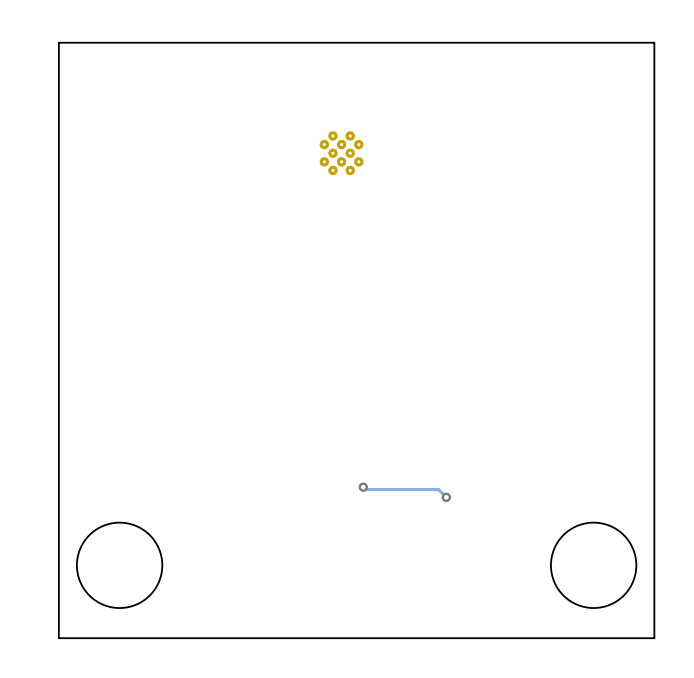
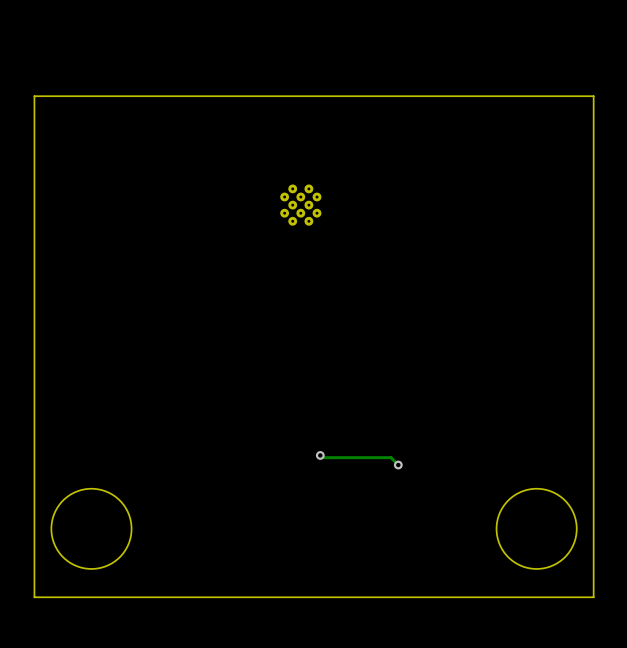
board edge: (654, 104) (654, 42) (58, 42) (58, 104) -> (593, 96) (34, 96)
part position: (341, 153) -> (300, 205)

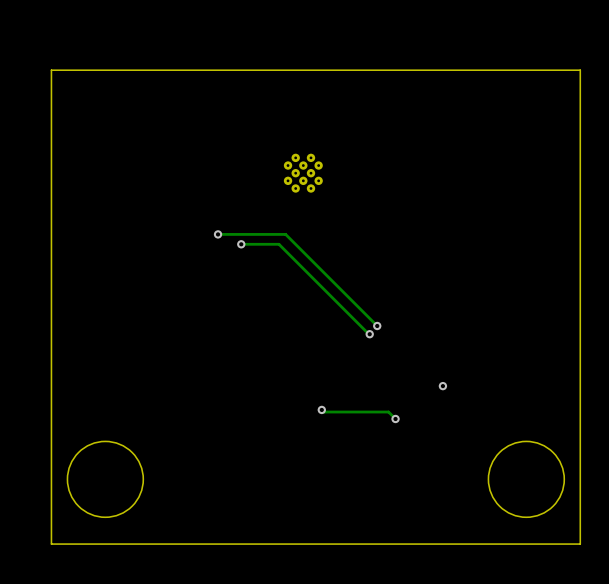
track: none -> (218, 234) (285, 234) (377, 325)
via: none -> (218, 234)
track: none -> (241, 244) (278, 244) (369, 334)
via: none -> (241, 244)
via: none -> (377, 325)
via: none -> (369, 334)
via: none -> (442, 386)

